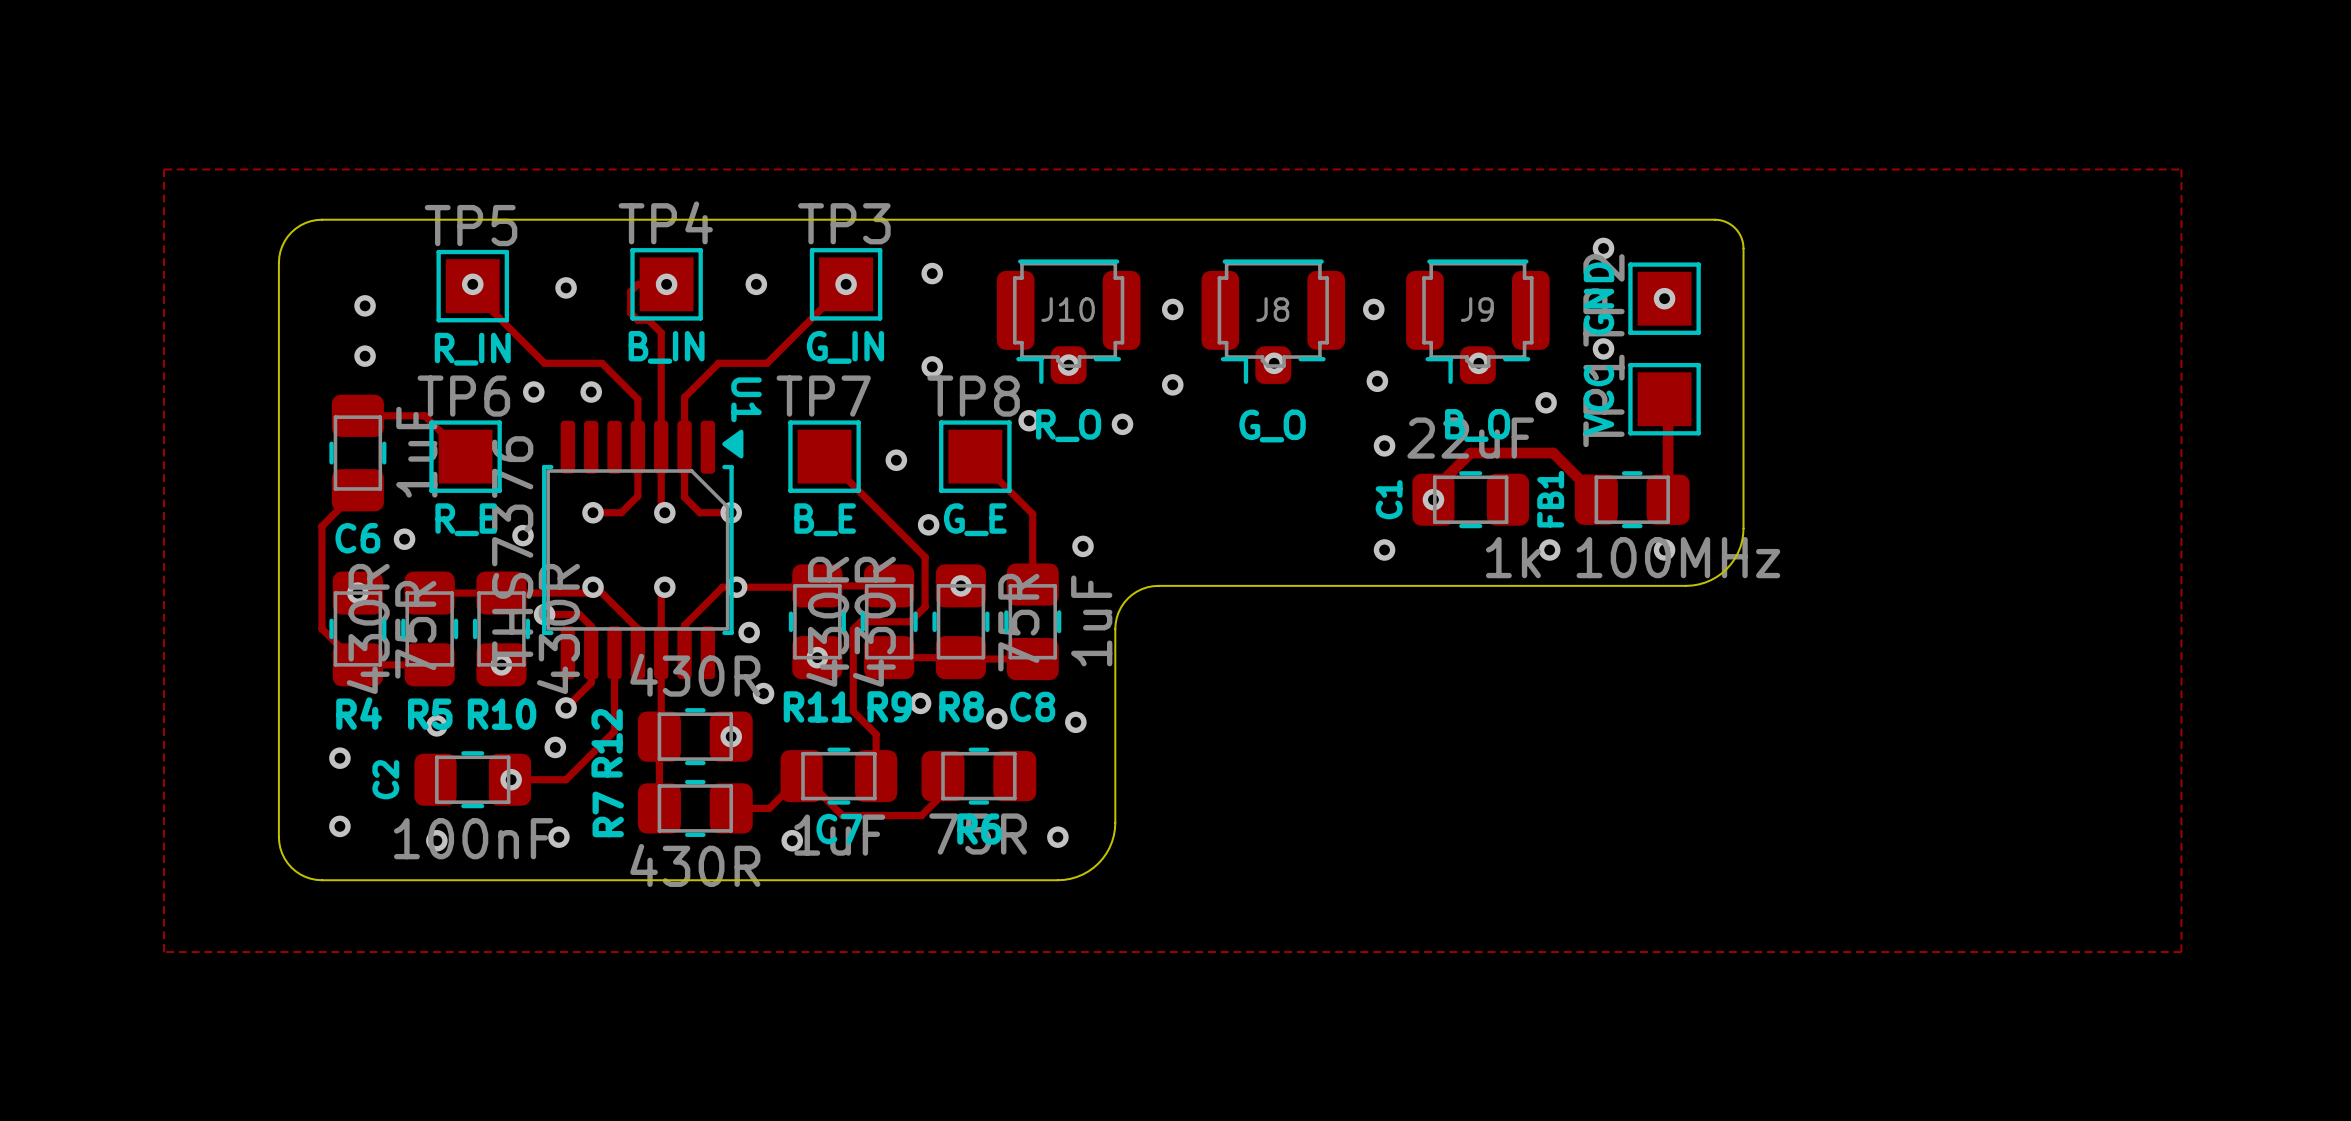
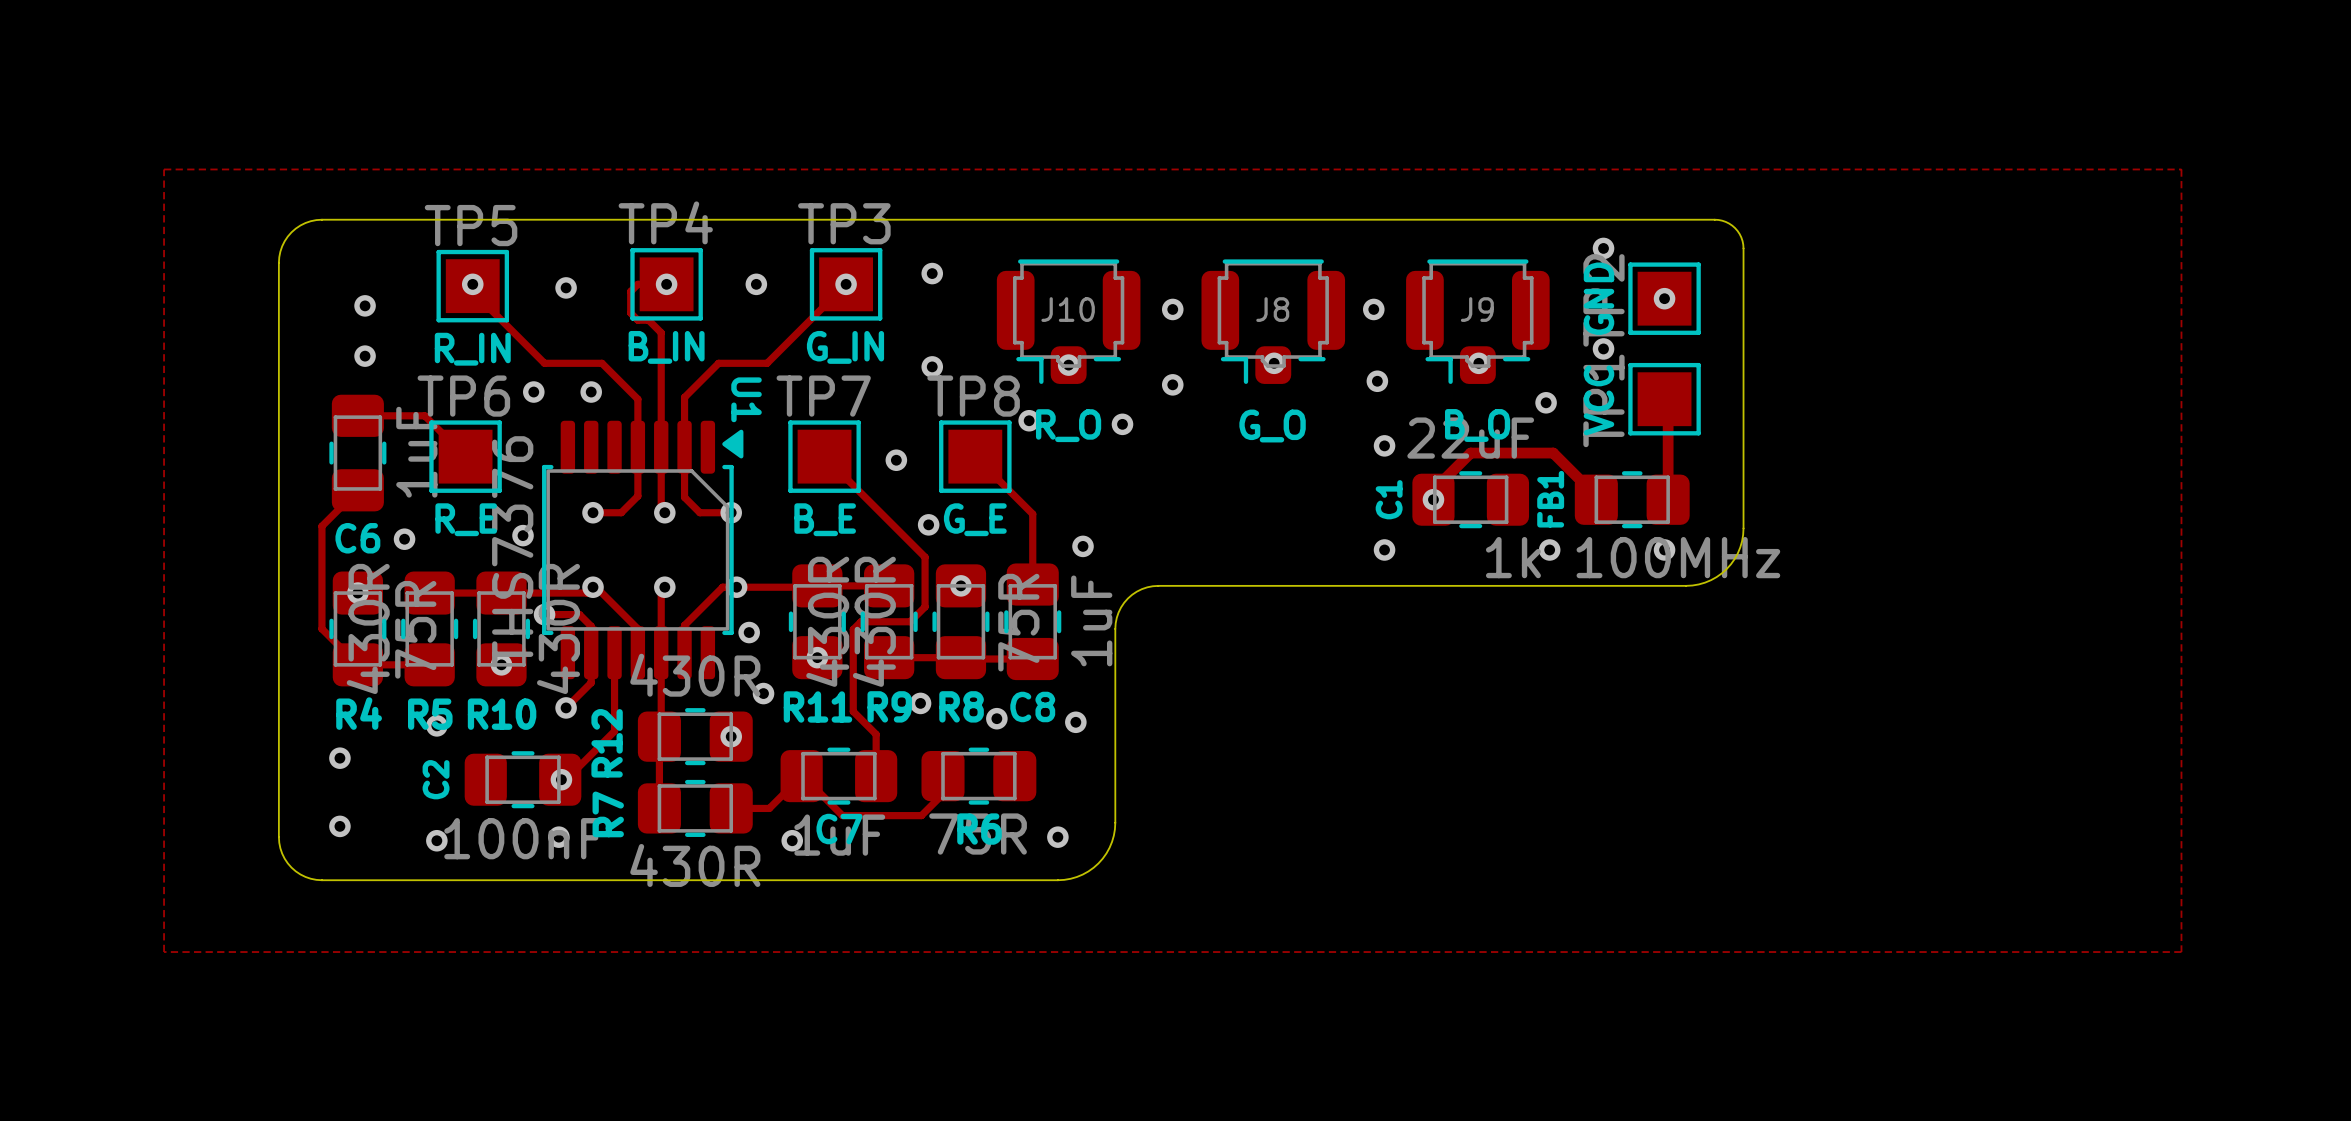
via: (555, 747) -> none
C2 position: (472, 779) -> (523, 779)
track: (510, 779) (560, 779) -> none
via: (511, 779) -> none
via: none -> (561, 779)

